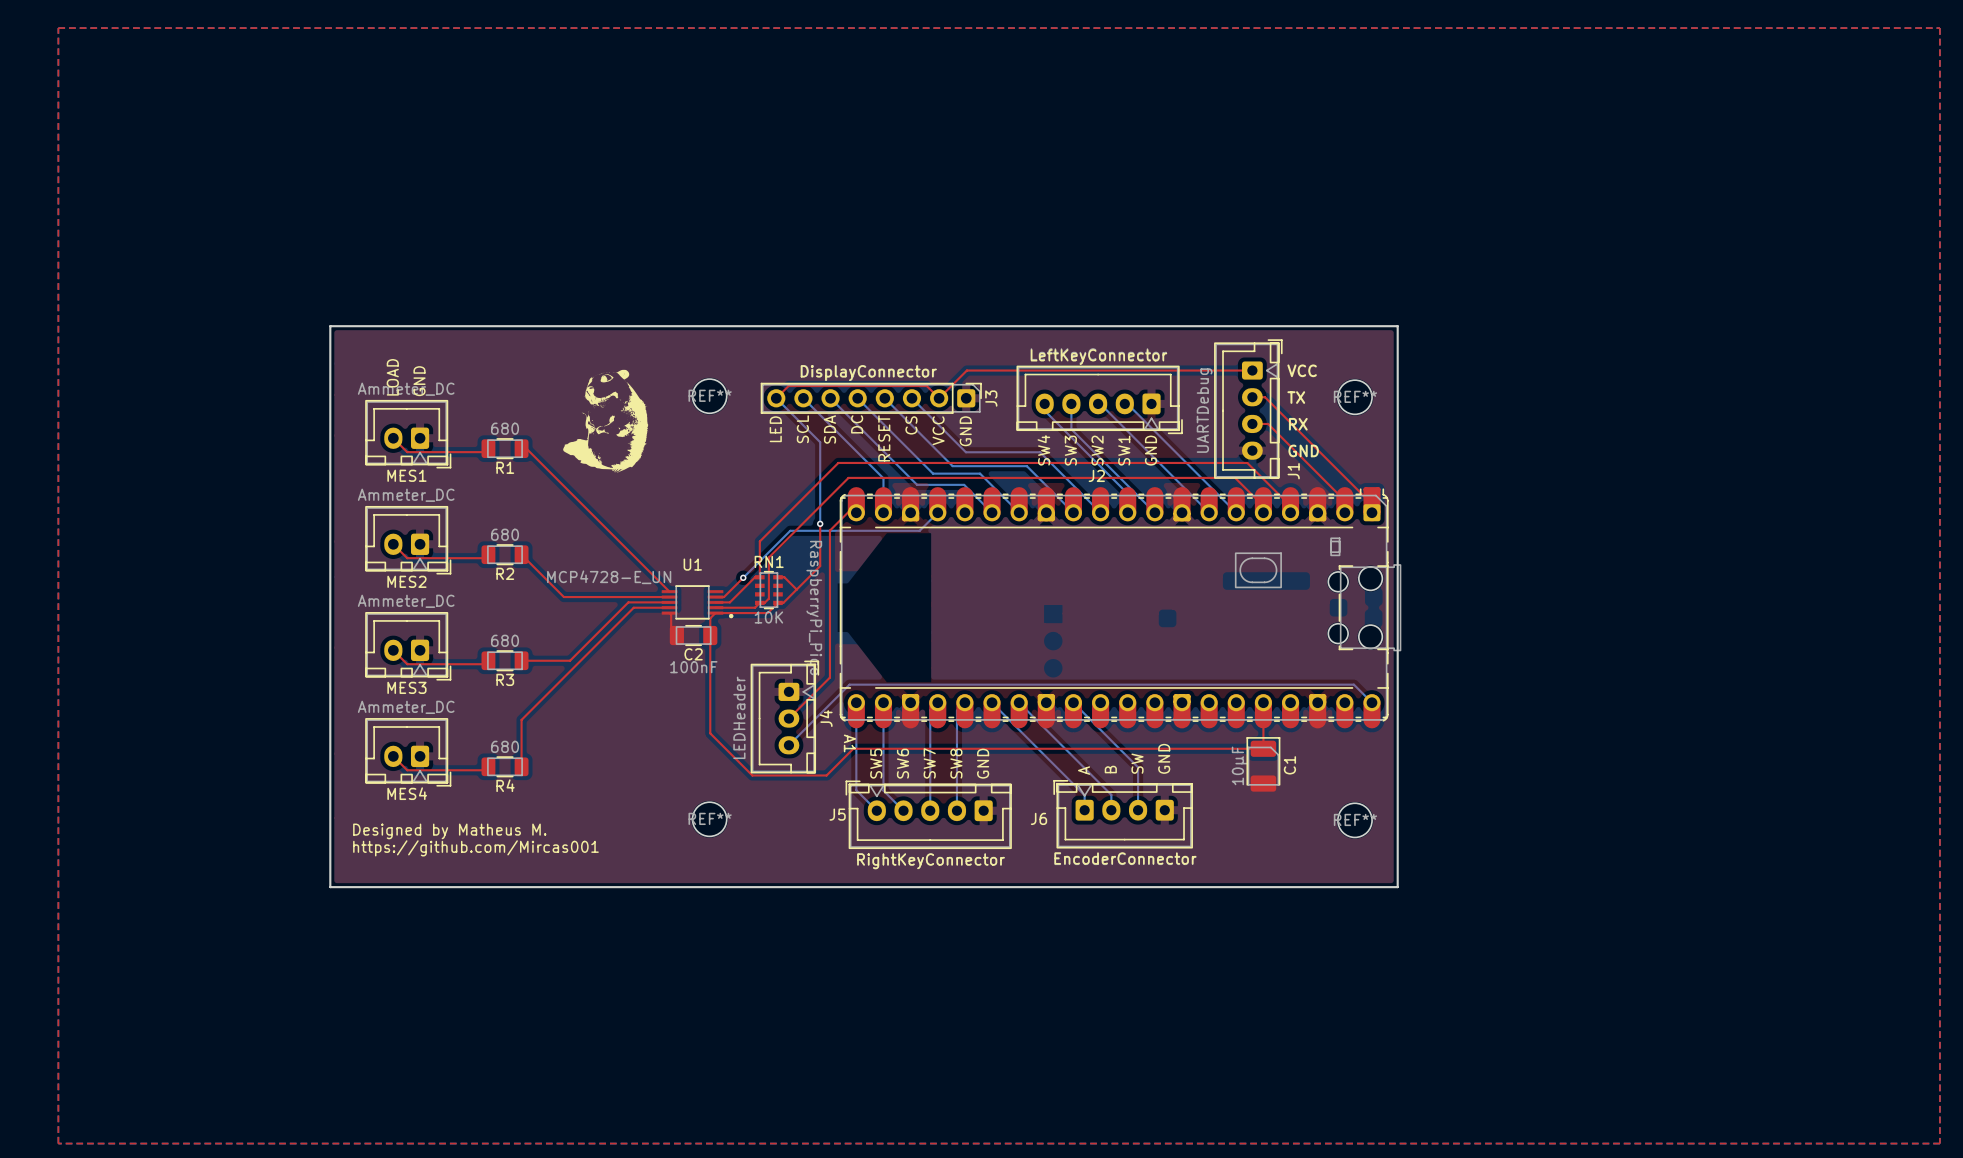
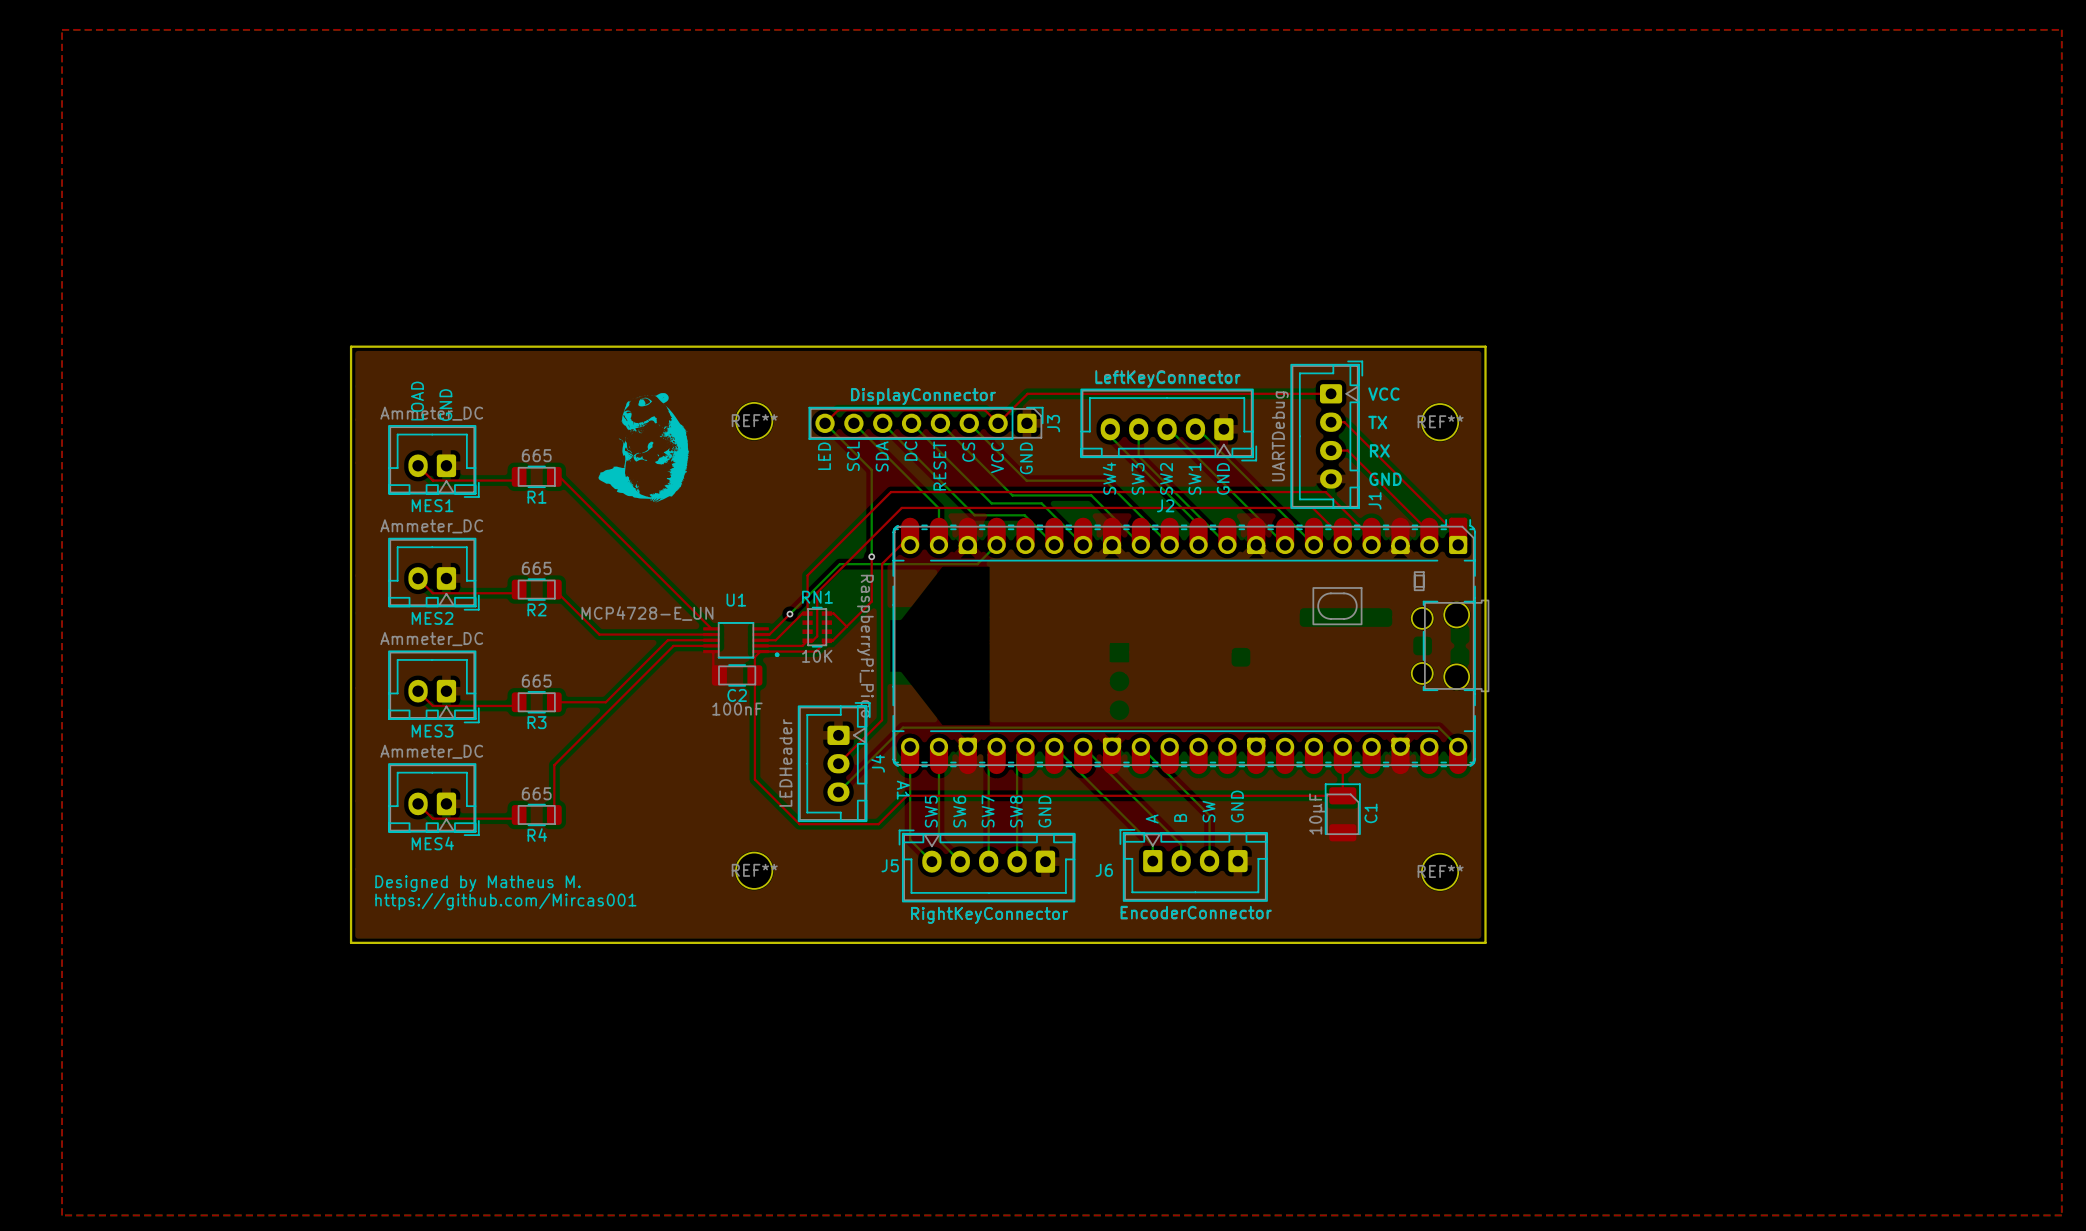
R1 value: 680 (505, 428) -> 665 (536, 455)
R2 value: 680 (505, 534) -> 665 (536, 568)
R3 value: 680 (505, 640) -> 665 (536, 681)
R4 value: 680 (505, 746) -> 665 (536, 793)

